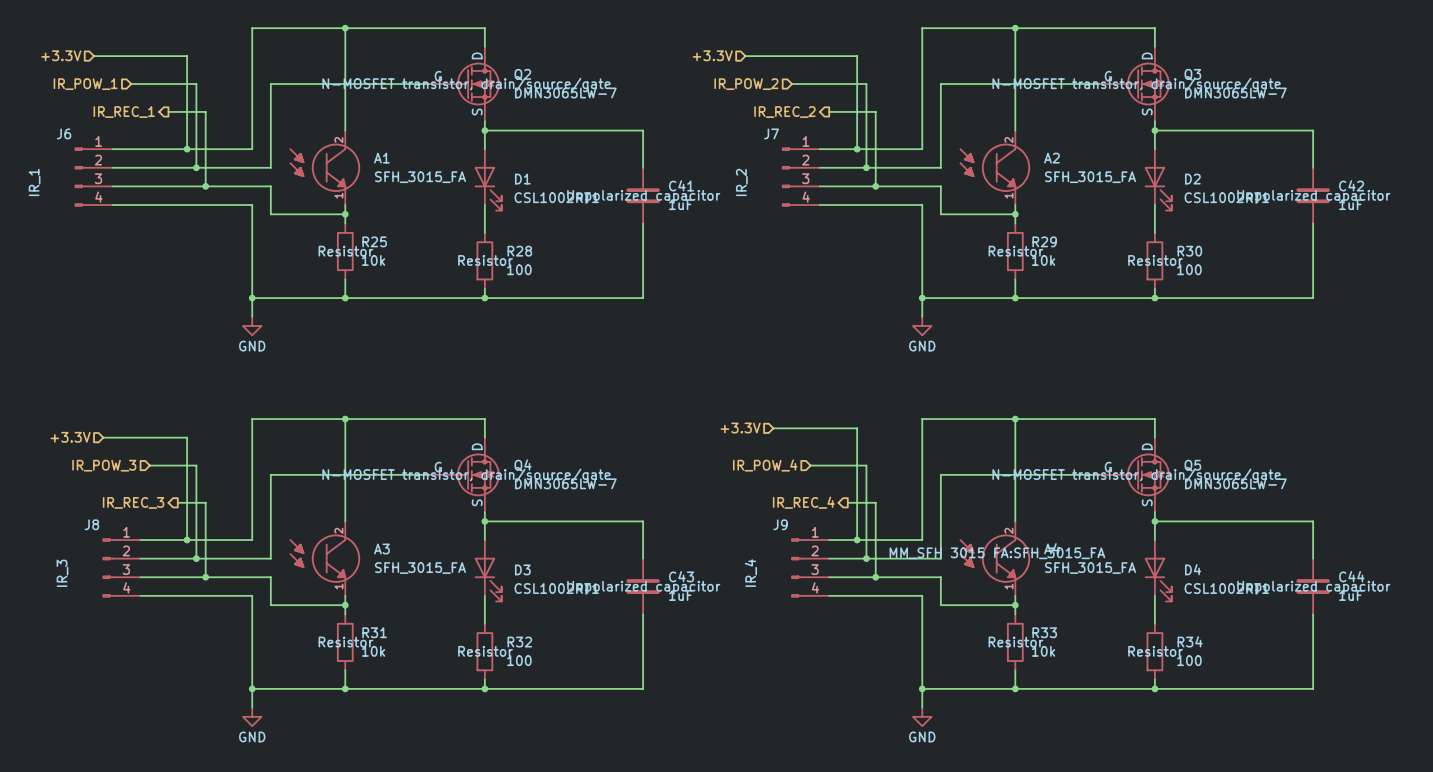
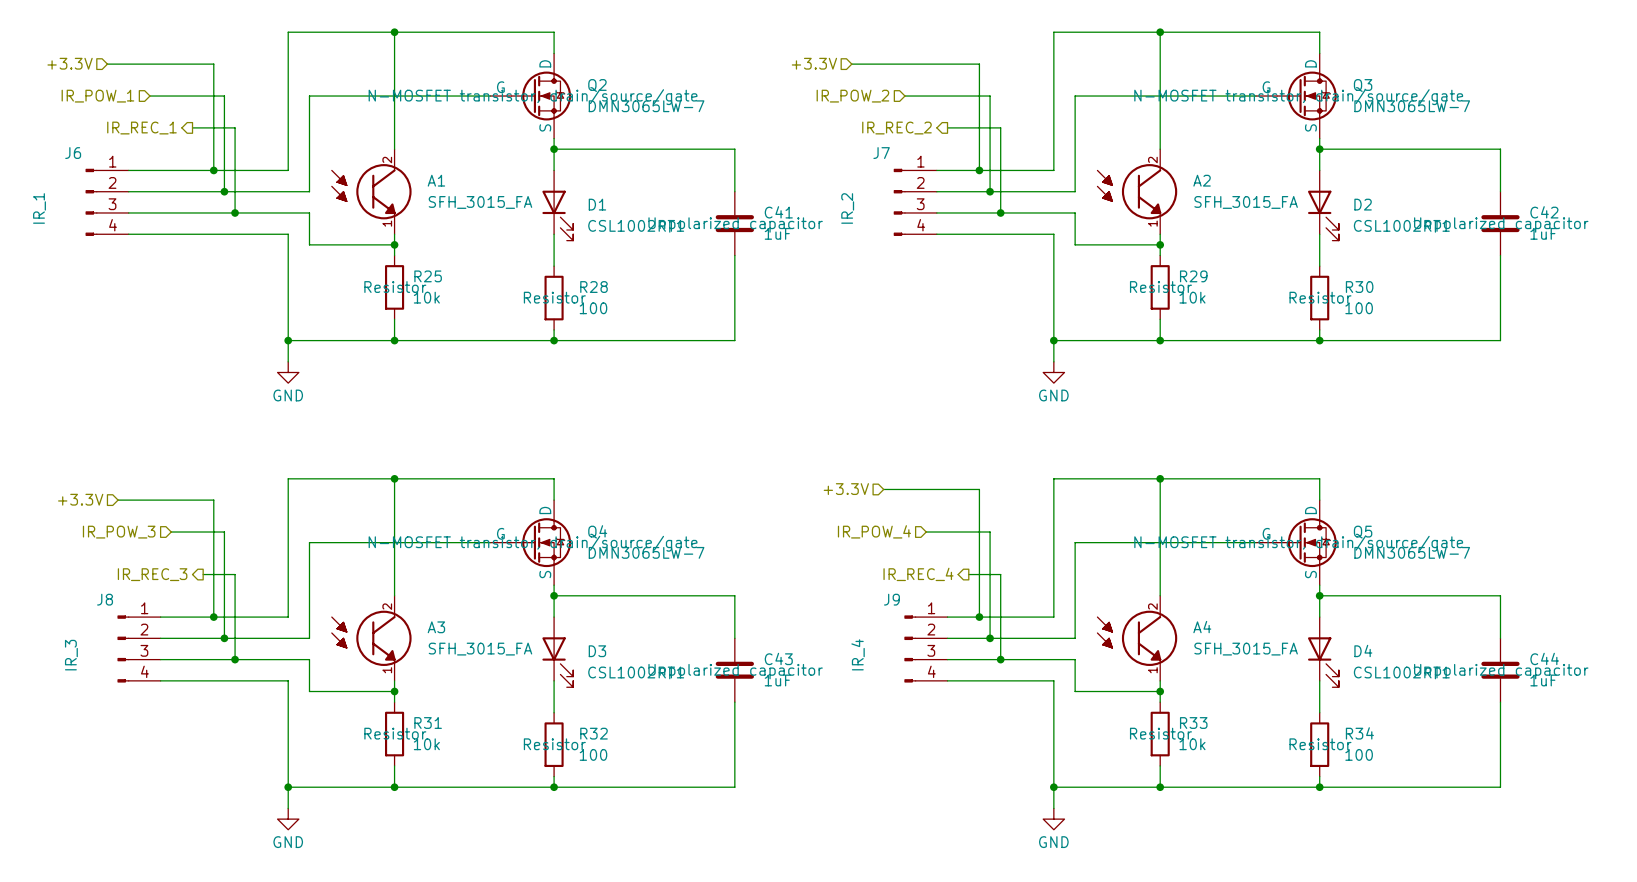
A4 text: MM_SFH 3015 FA:SFH_3015_FA (997, 553) -> none

